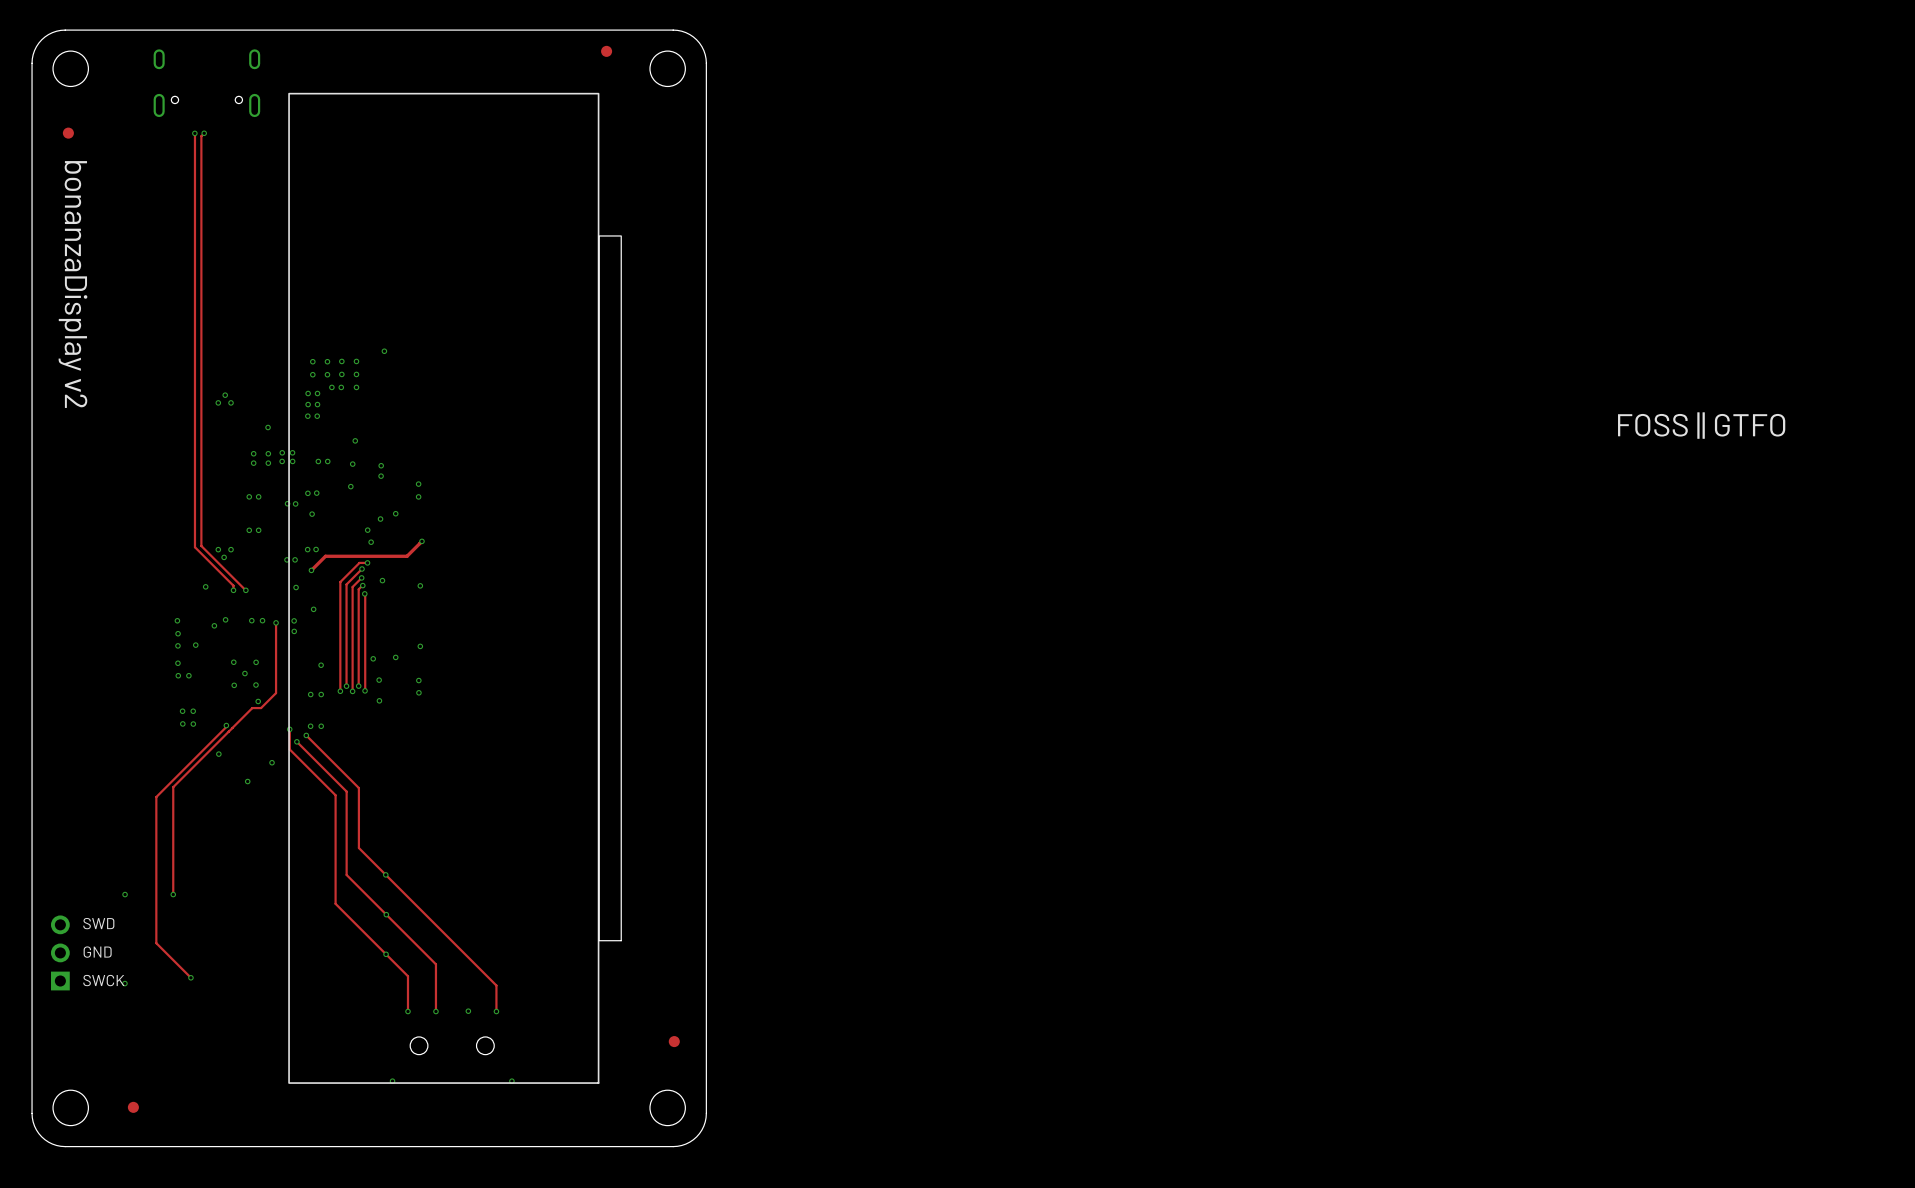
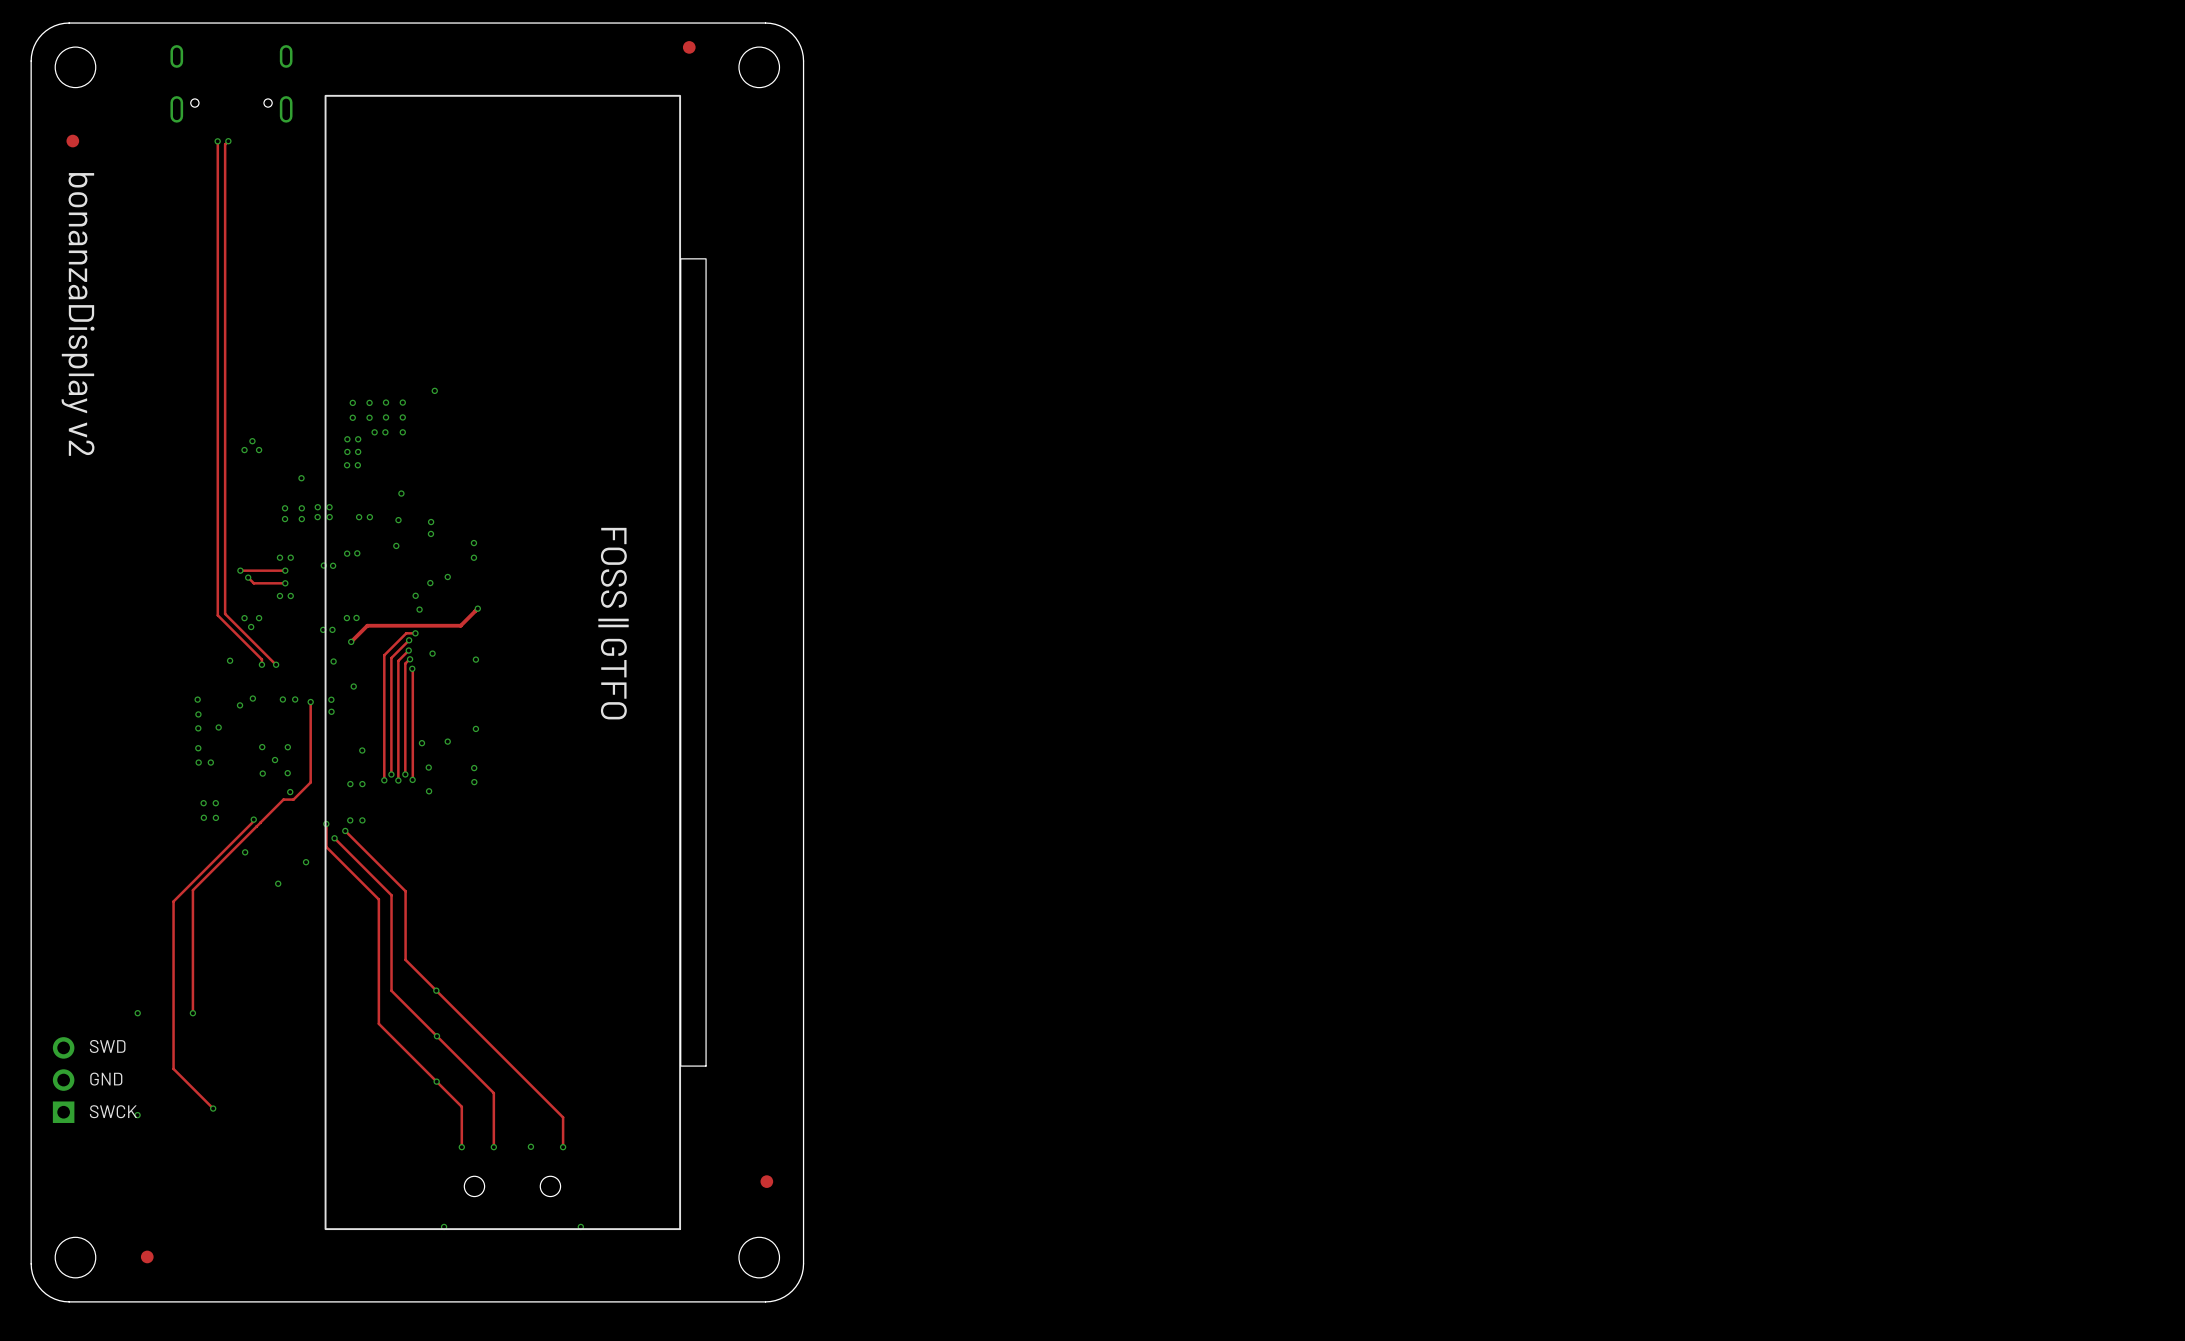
text: FOSS || GTFO (1701, 425) -> none
track: none -> (240, 570) (285, 570)
via: none -> (240, 570)
via: none -> (285, 570)
track: none -> (248, 577) (253, 583) (285, 583)
via: none -> (248, 577)
via: (312, 514) -> none
via: none -> (285, 583)
text: none -> FOSS || GTFO (613, 623)

